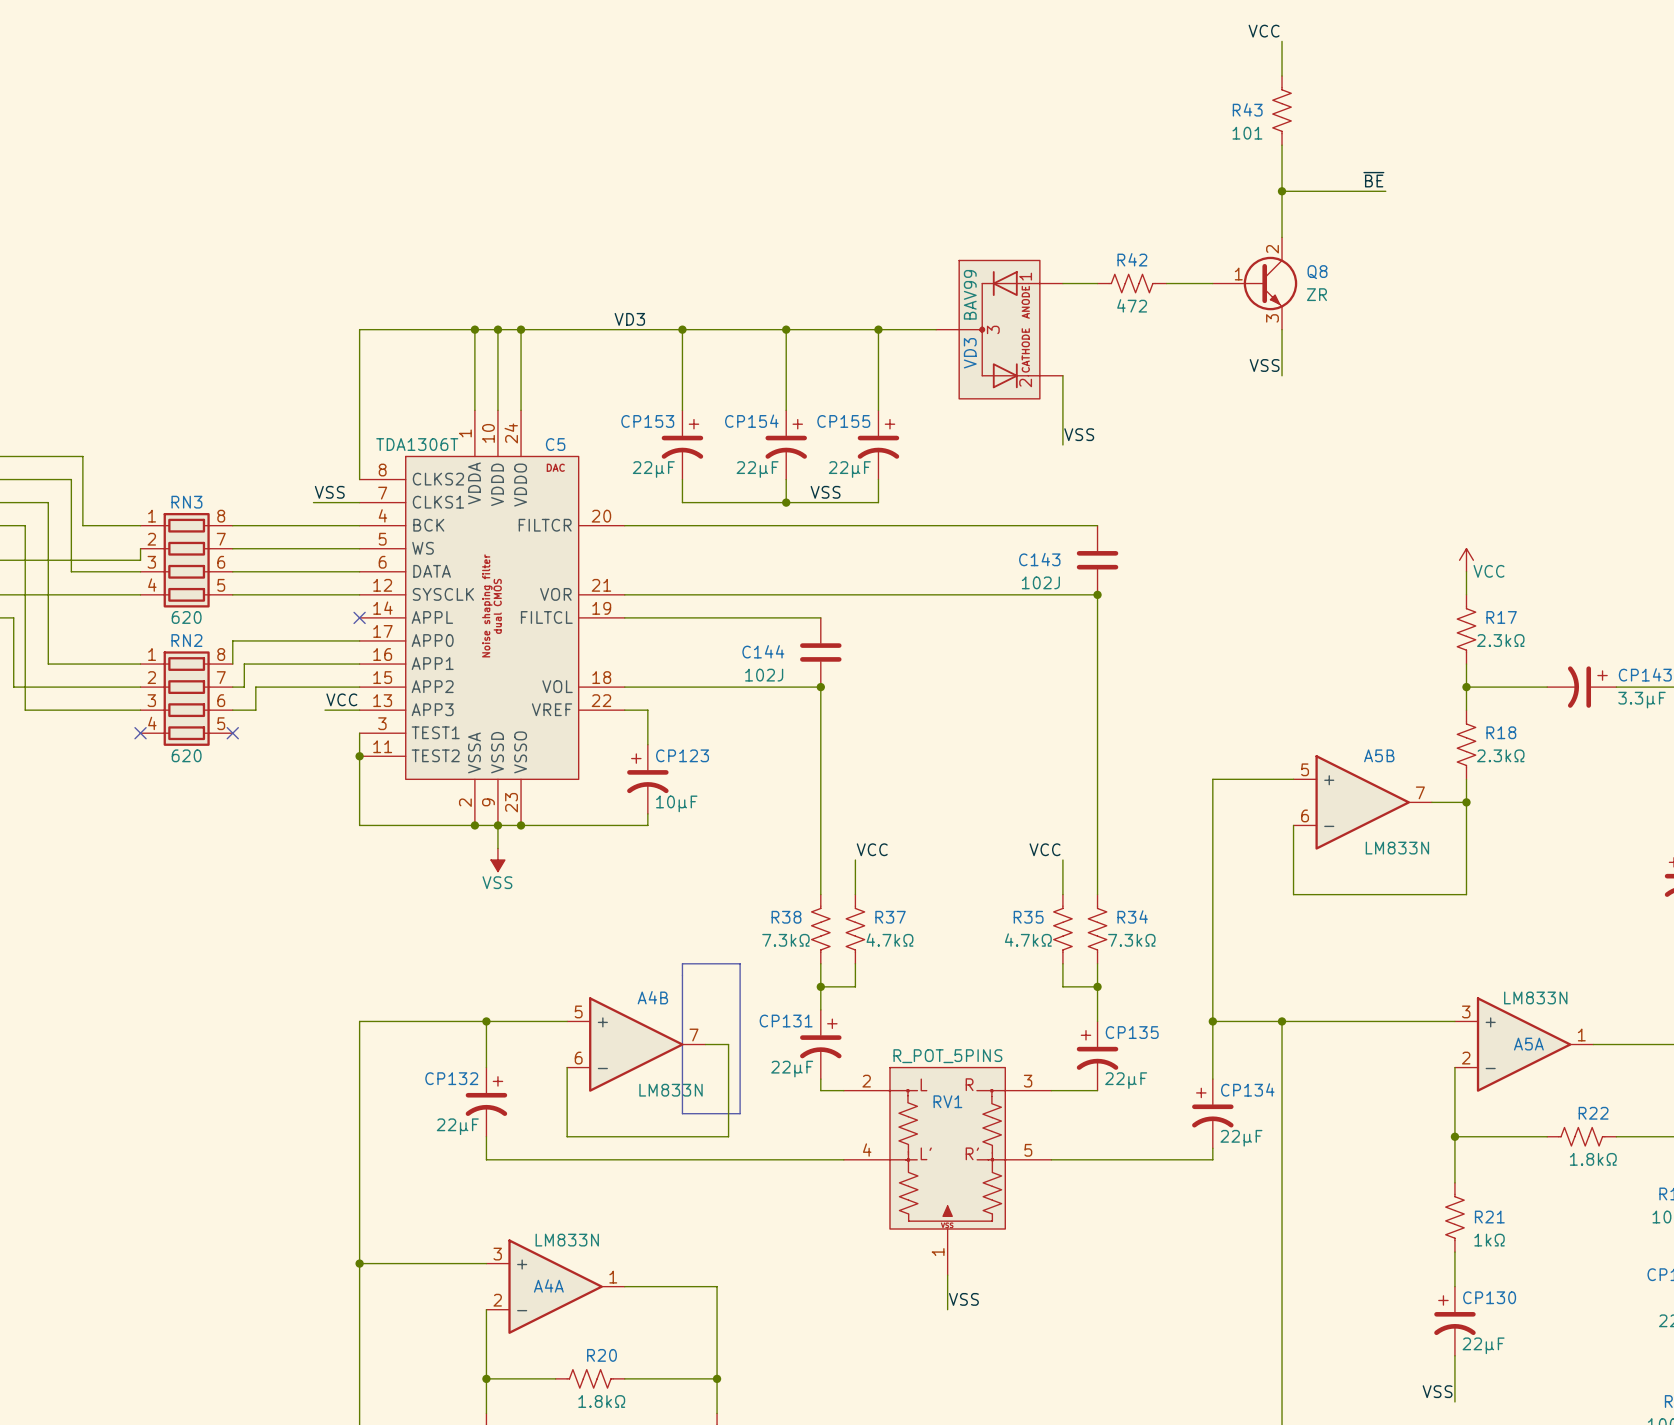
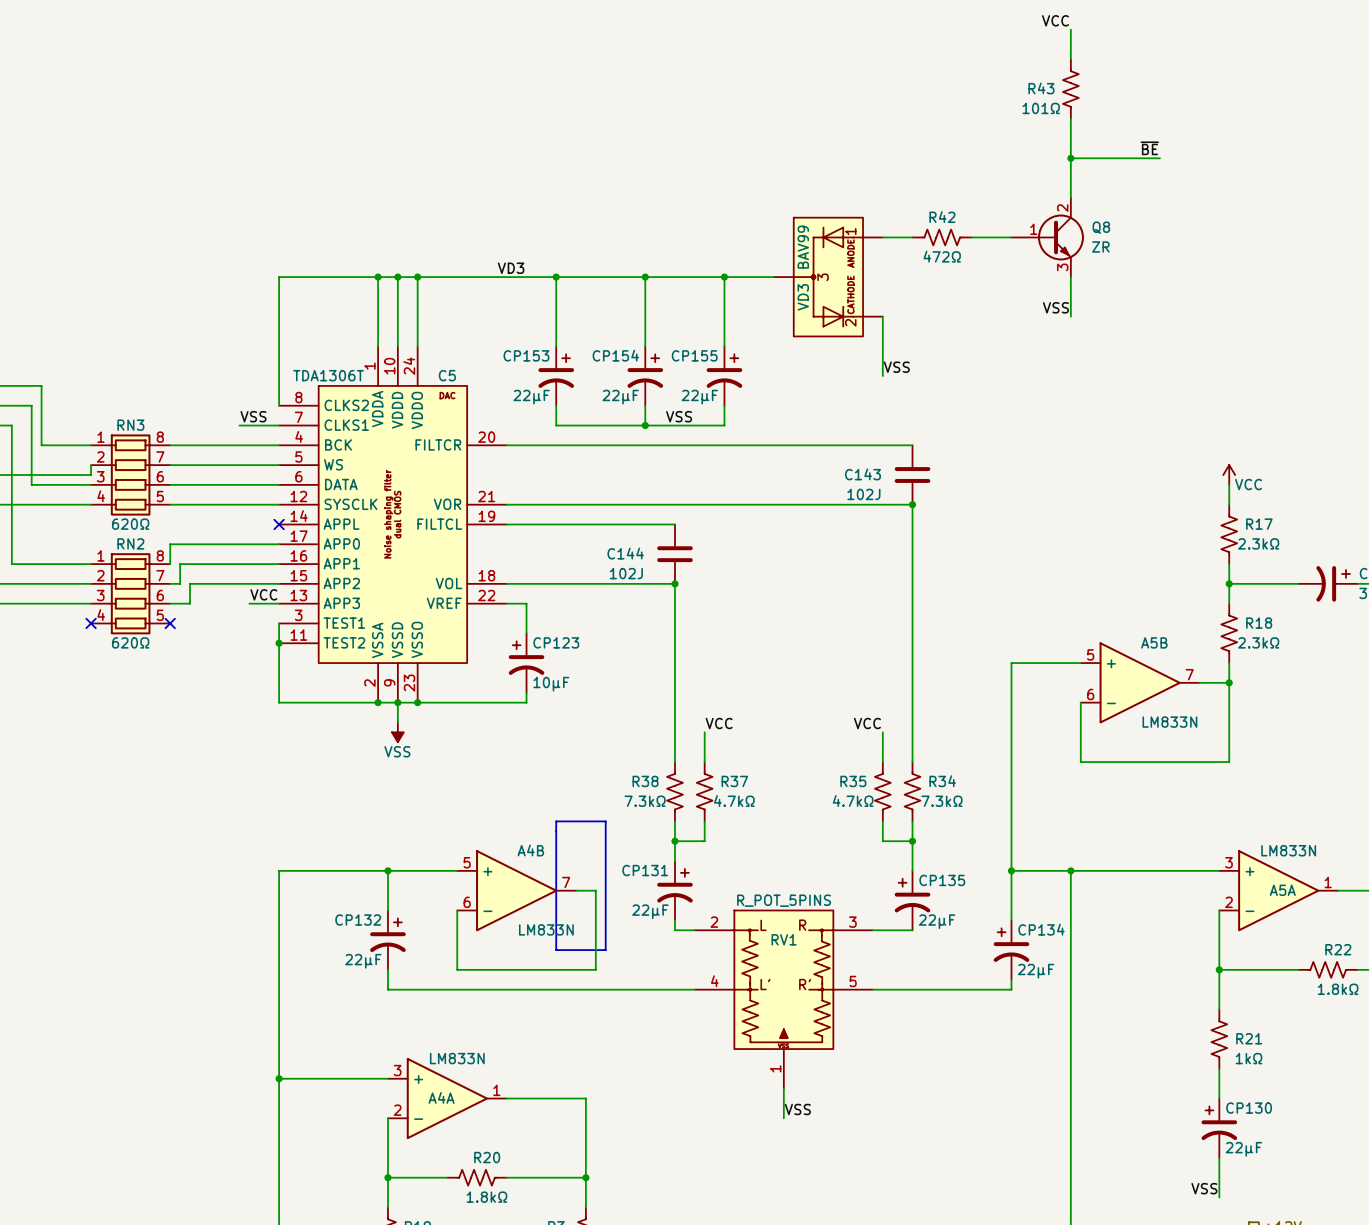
R43 value: 101 (1247, 133) -> 101Ω (1041, 108)
R42 value: 472 (1132, 305) -> 472Ω (942, 256)
RN3 value: 620 (186, 617) -> 620Ω (130, 524)
RN2 value: 620 (186, 755) -> 620Ω (130, 642)

